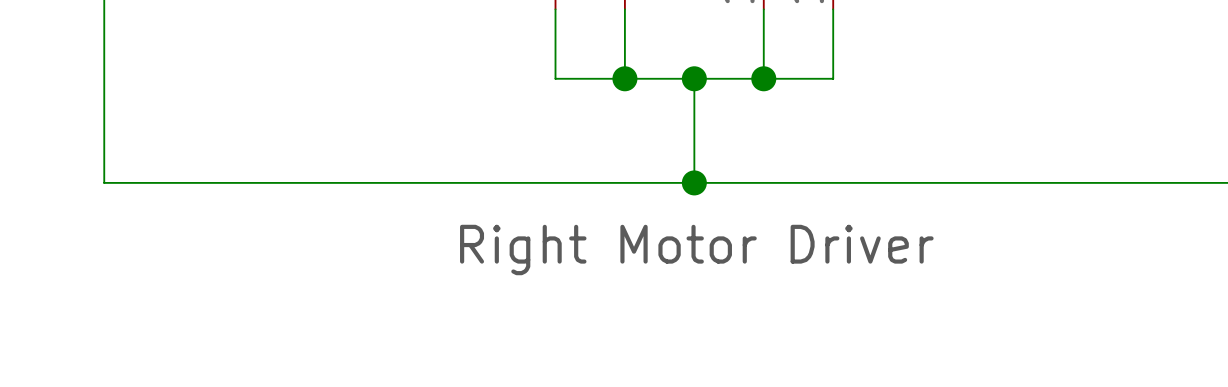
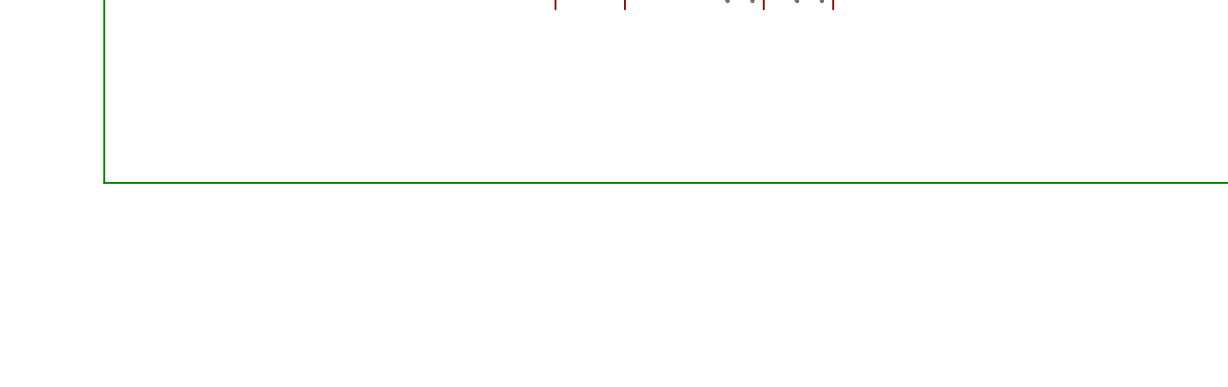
wire: (555, 9) (555, 78) (833, 78) (833, 9) -> none
wire: (624, 9) (624, 78) -> none
wire: (763, 9) (763, 78) -> none
junction: (624, 78) -> none
wire: (694, 78) (694, 182) -> none
junction: (694, 78) -> none
junction: (763, 78) -> none
junction: (694, 182) -> none
text: Right Motor Driver (696, 250) -> none

